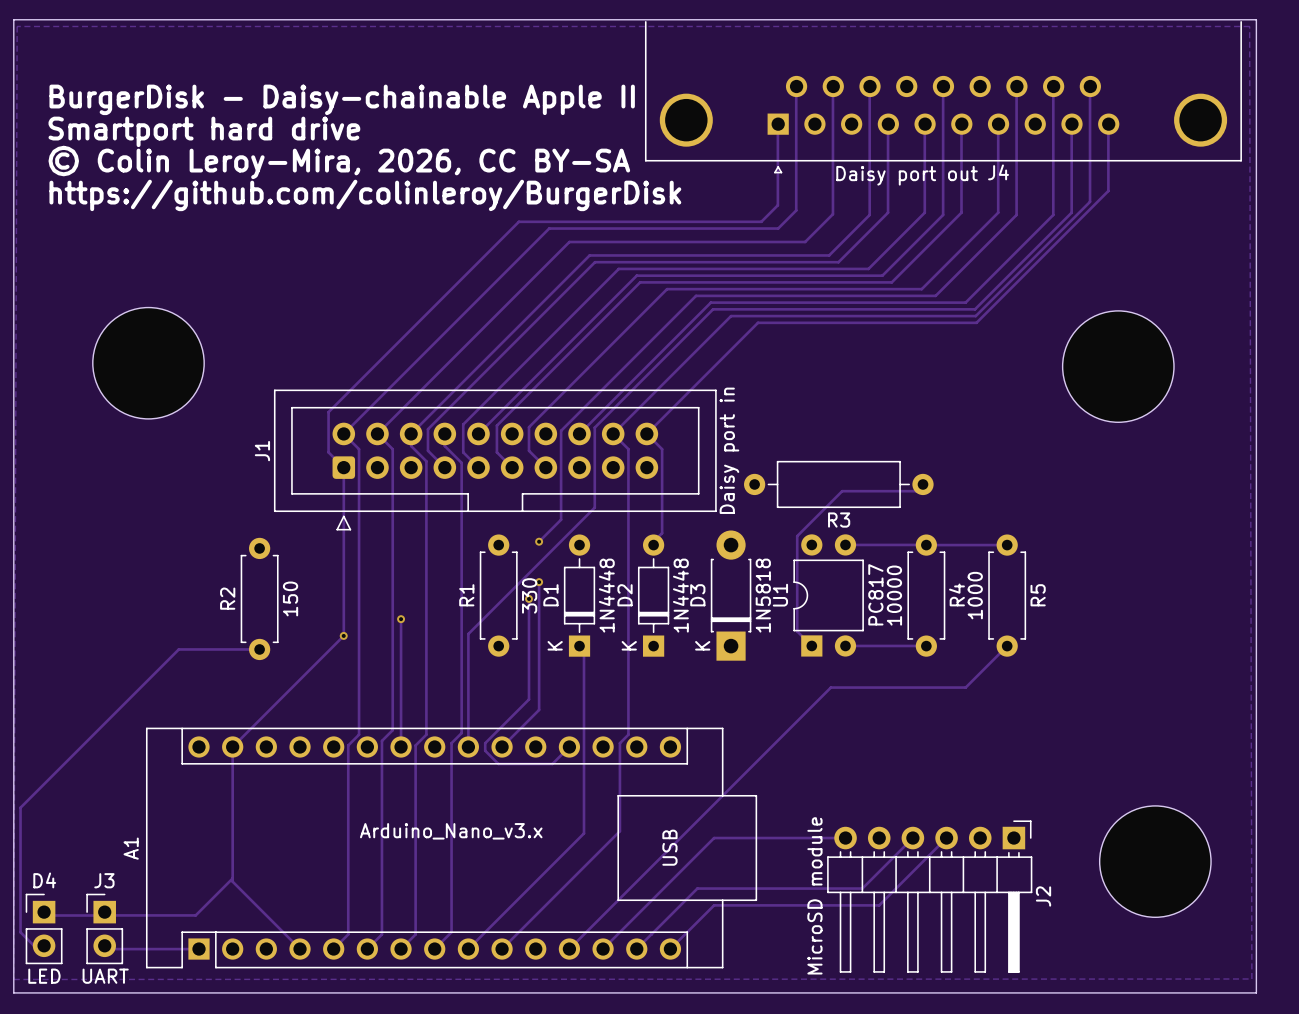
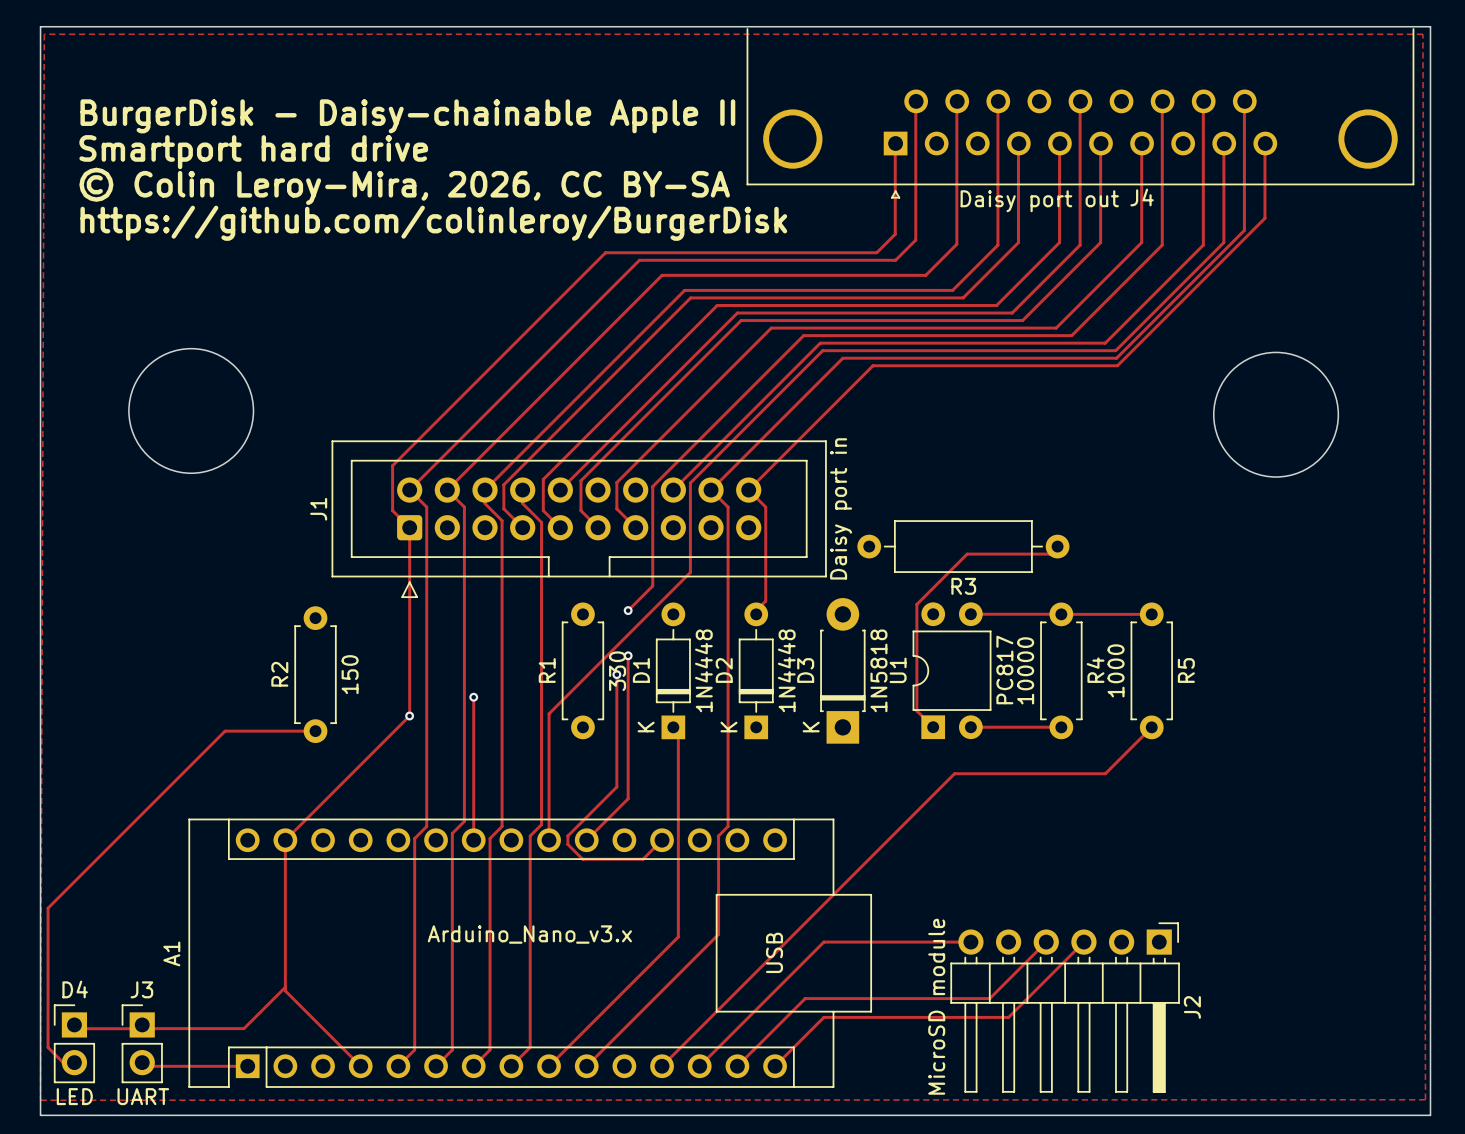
part: (1155, 861) -> none

